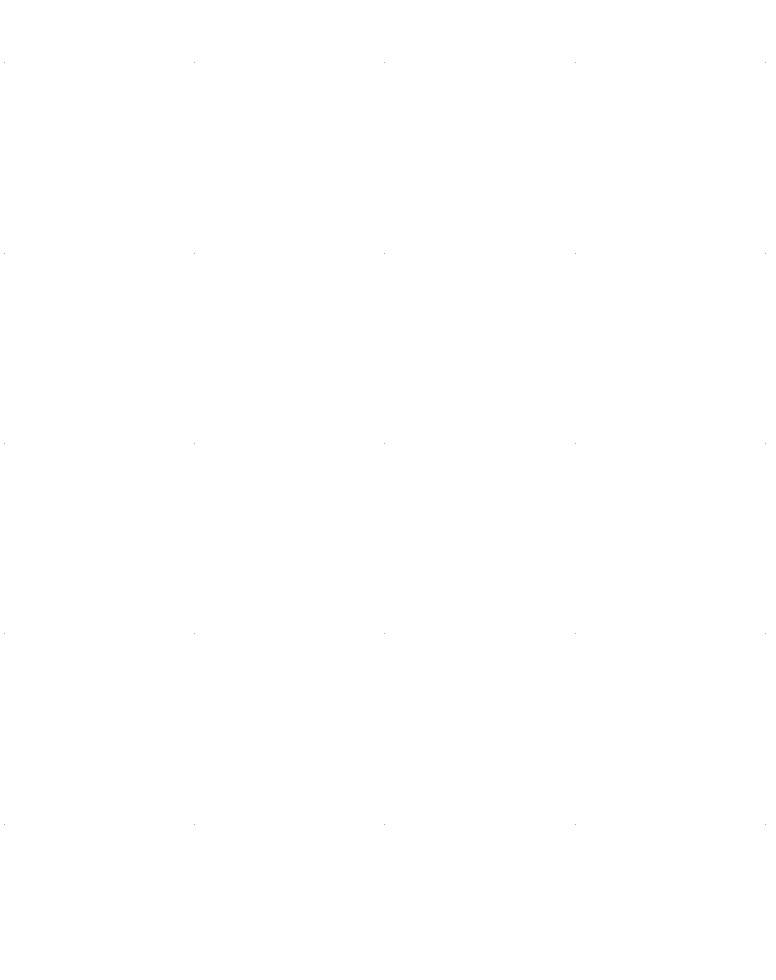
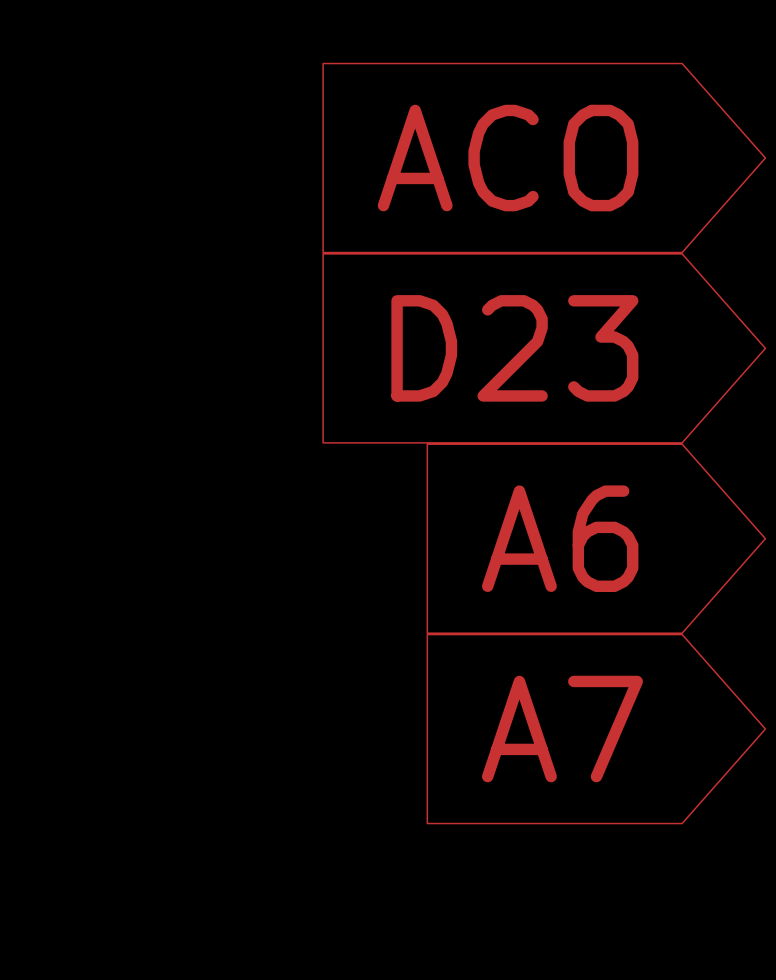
global label: none -> ACO (508, 158)
global label: none -> D23 (514, 348)
global label: none -> A6 (560, 538)
global label: none -> A7 (562, 729)

